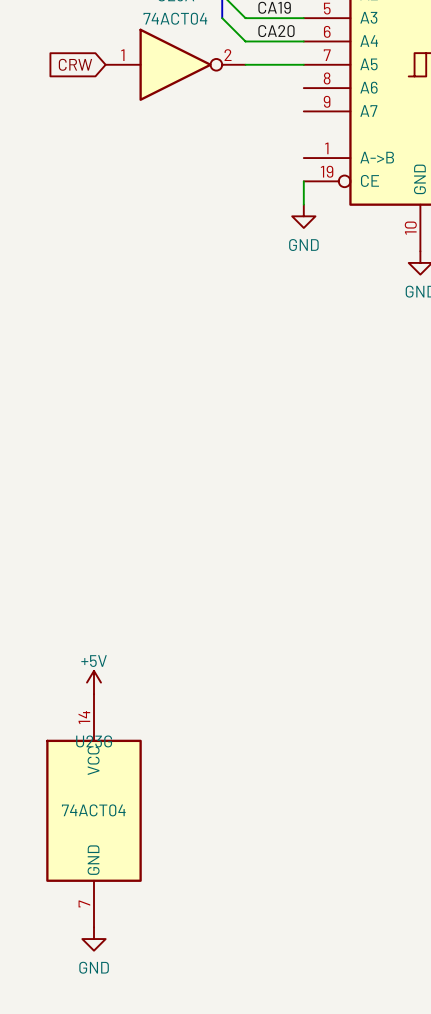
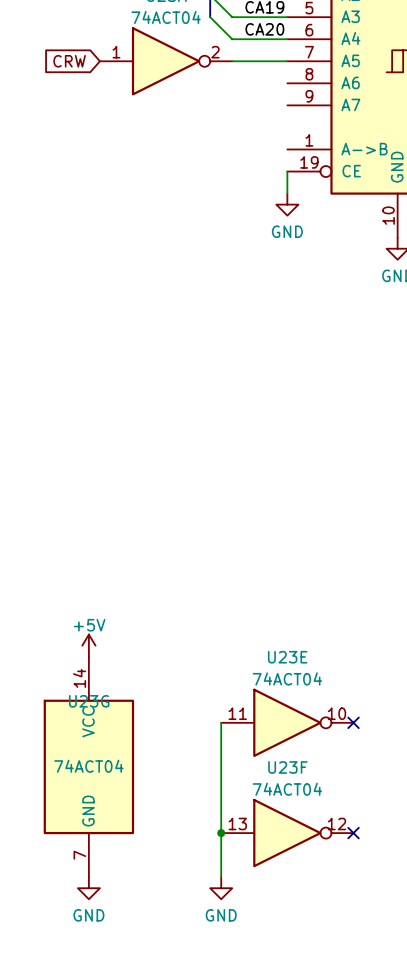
wire: none -> (221, 722) (221, 877)
U23E: none -> 74ACT04 (287, 722)
no-connect mark: none -> (353, 722)
junction: none -> (221, 833)
U23F: none -> 74ACT04 (287, 833)
no-connect mark: none -> (353, 833)
power symbol: none -> GND (221, 888)

